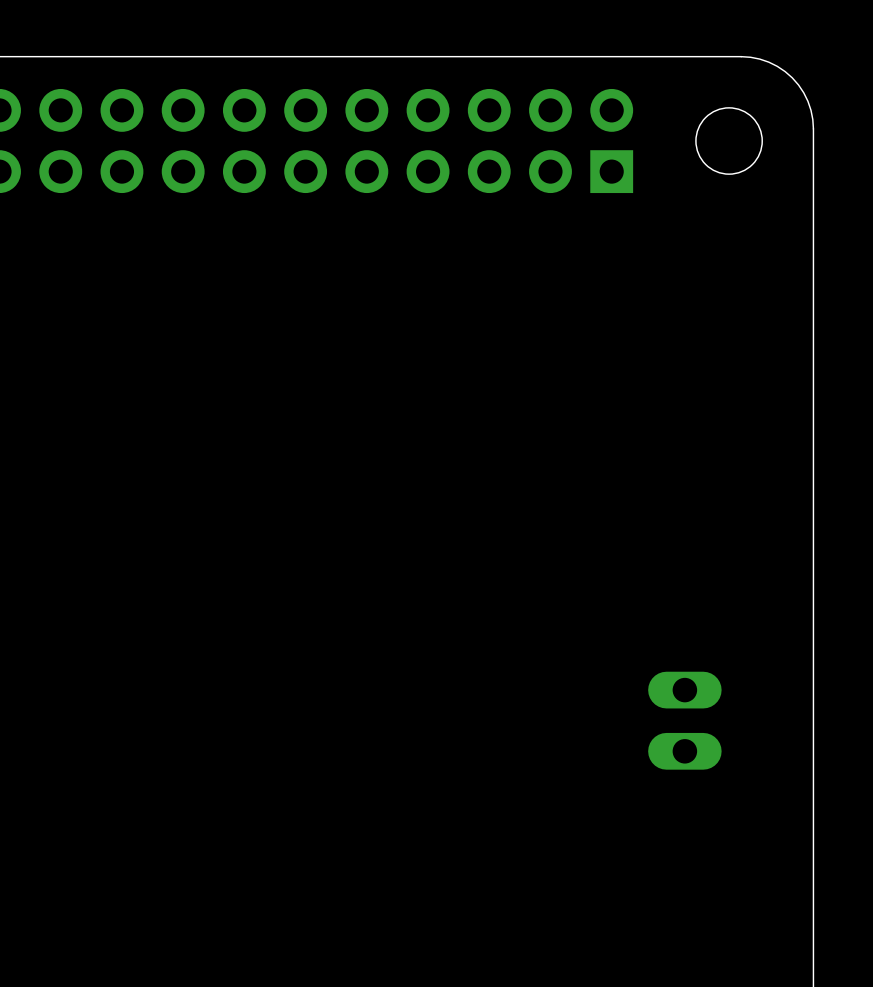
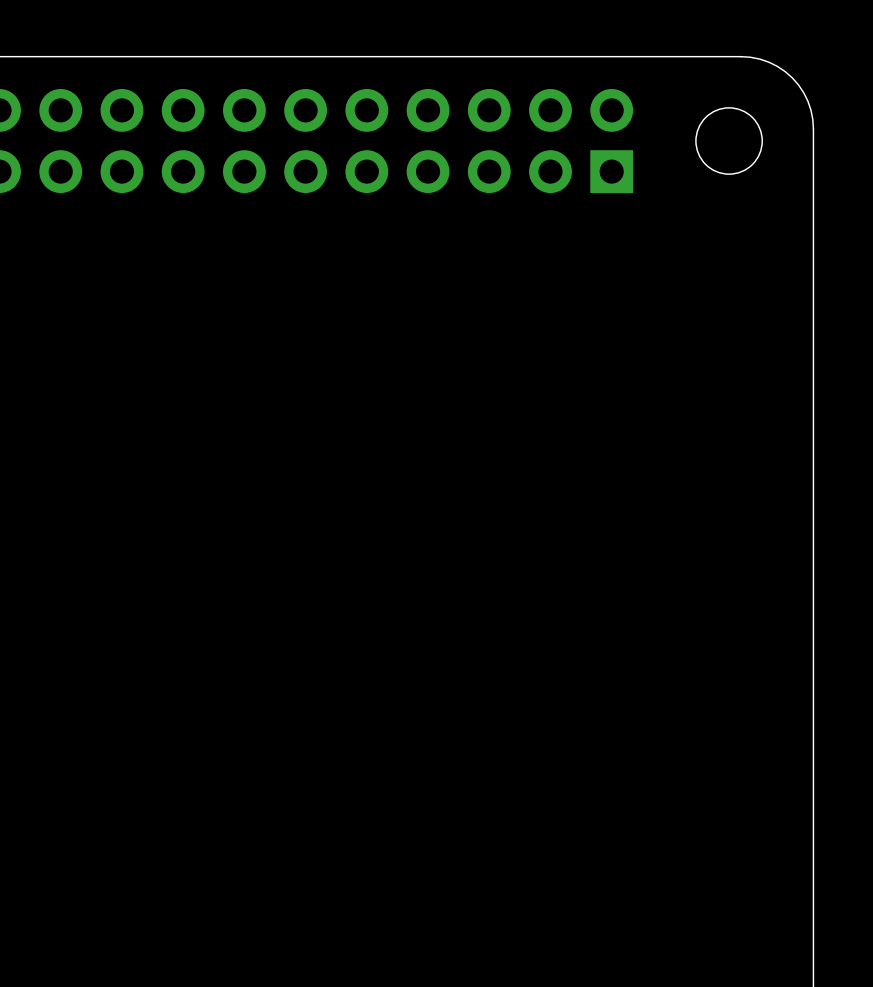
part: (684, 720) -> none

